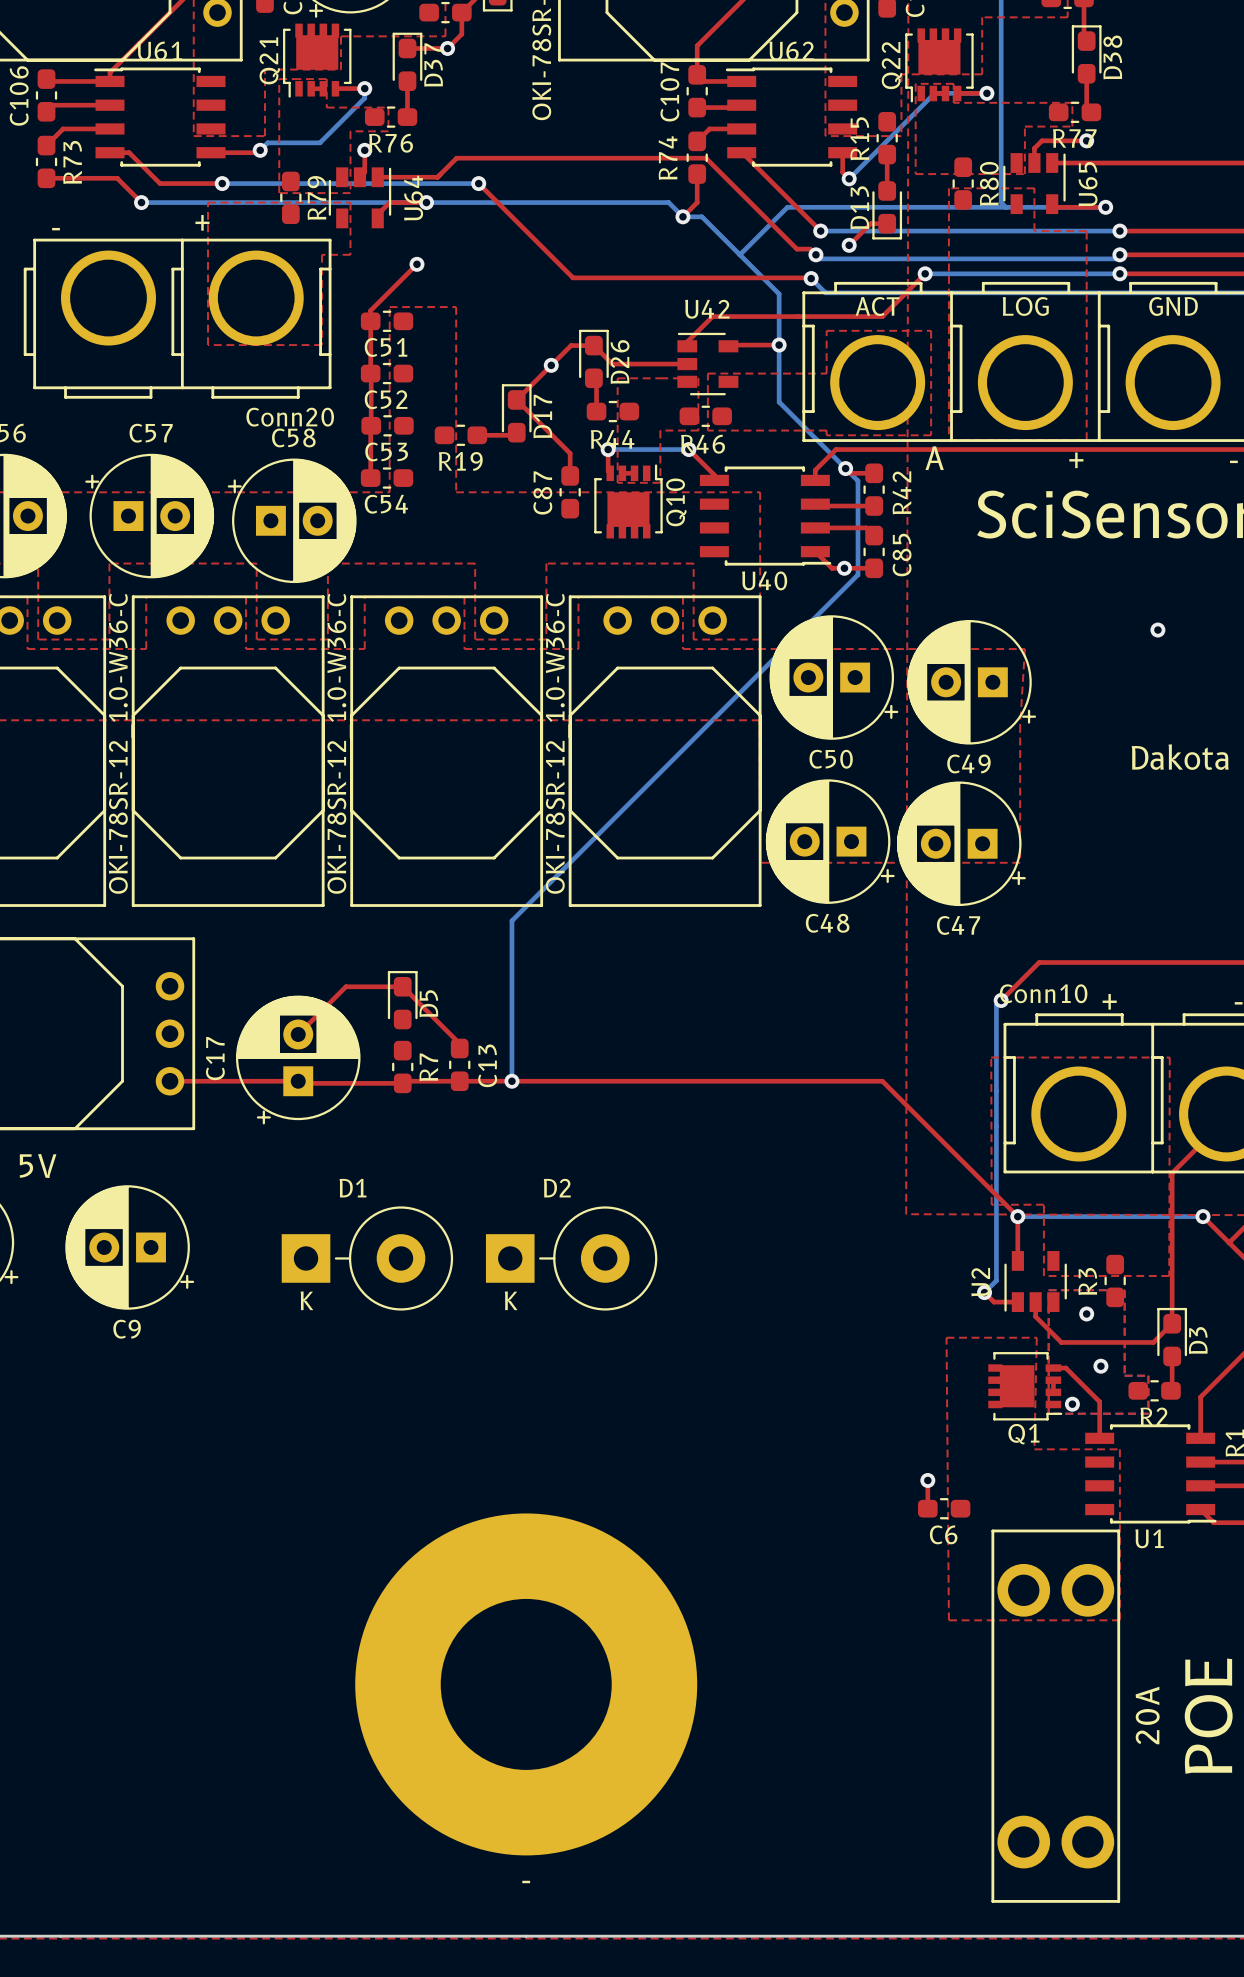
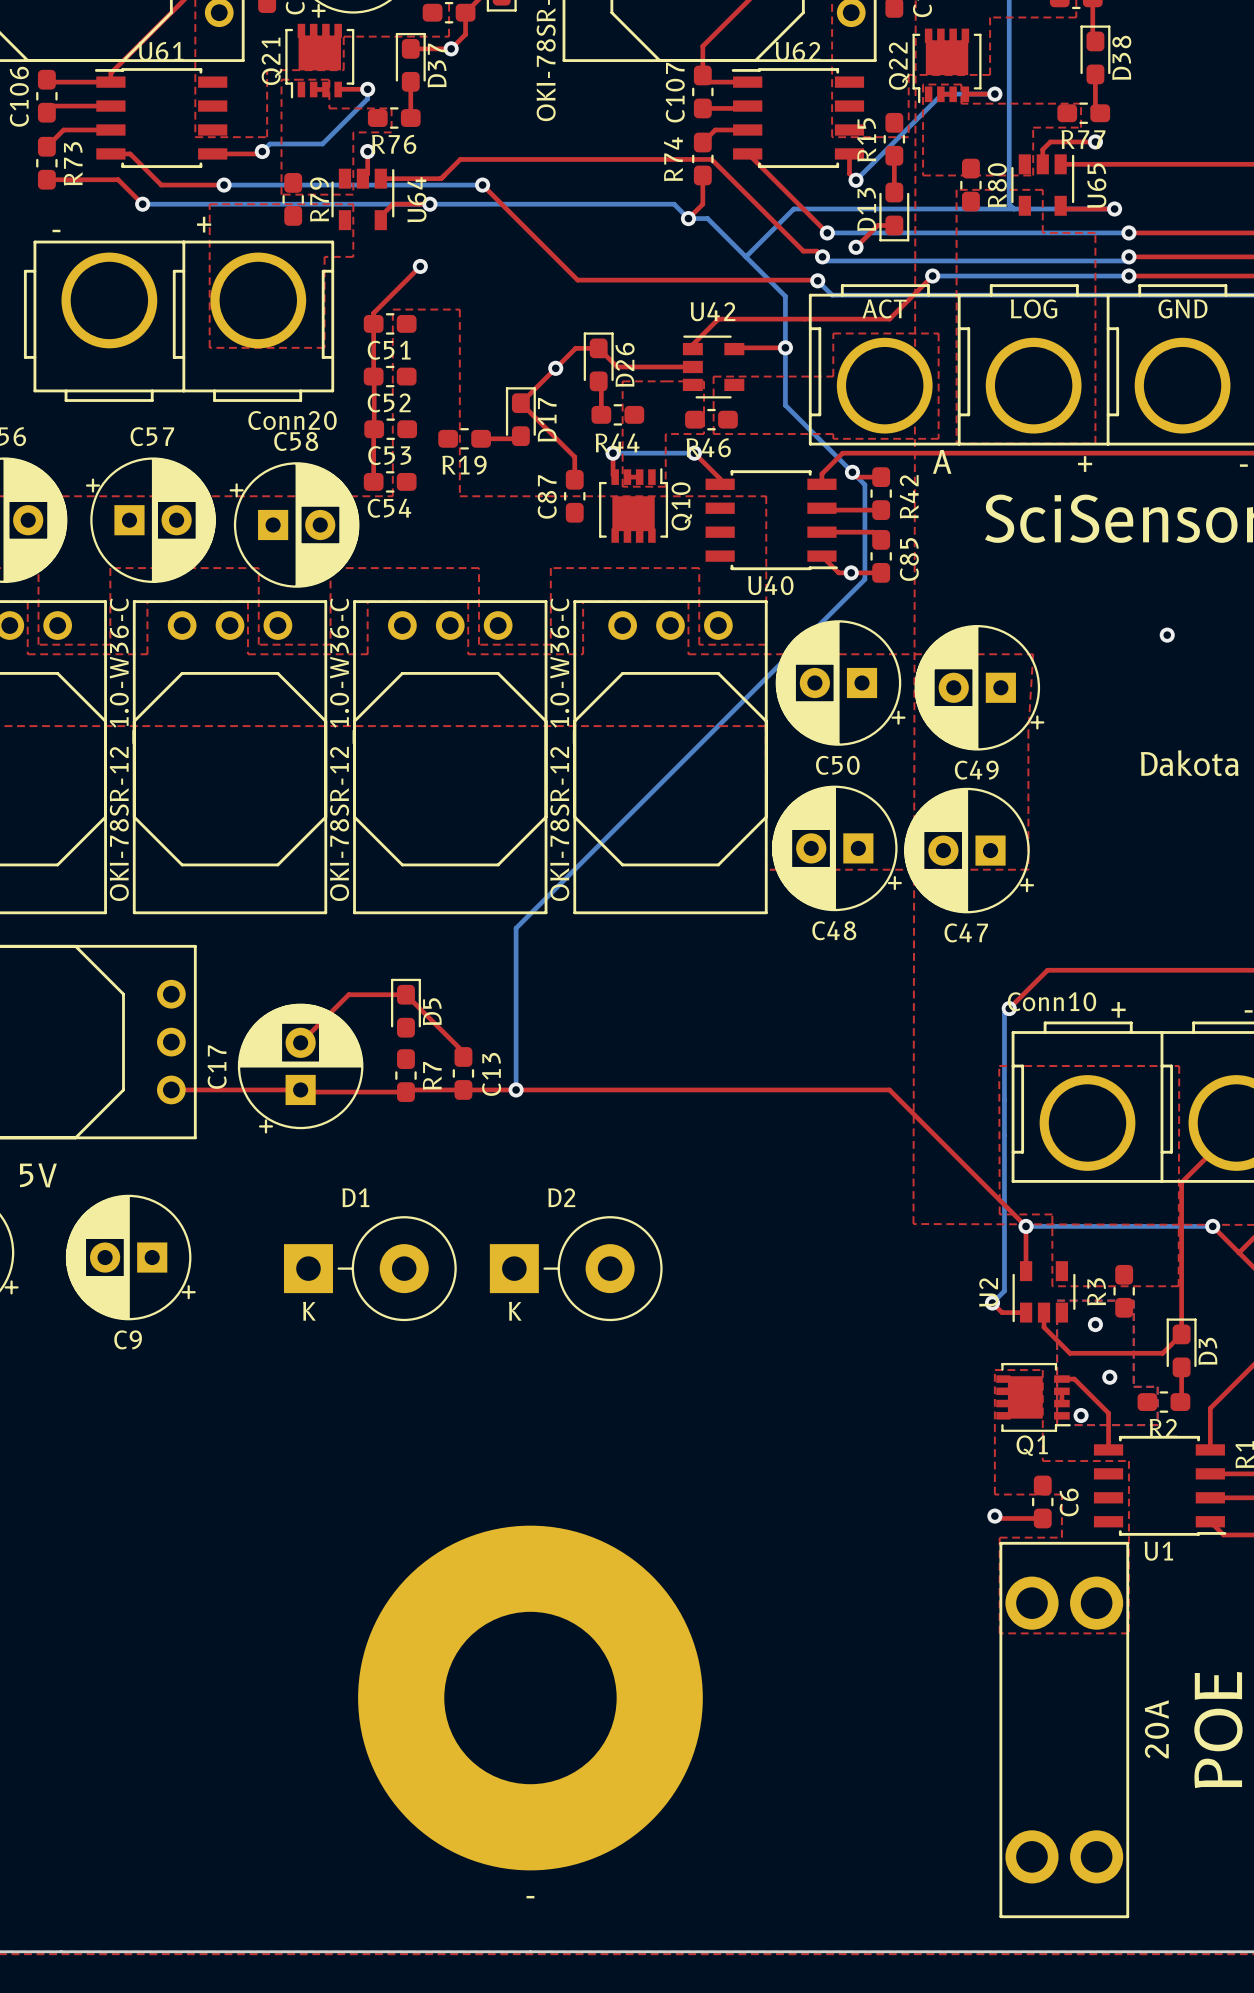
top zone outline: (1034, 1449) (1036, 1337) (946, 1337) (948, 1620) (991, 1620) -> (1042, 1461) (1042, 1370) (994, 1370) (994, 1494) (1061, 1494) (1061, 1537) (999, 1537) (999, 1633)
top track: (927, 1480) (927, 1508) -> none
via position: (927, 1480) -> (994, 1516)
top track: none -> (994, 1516) (997, 1518) (1042, 1518)
C6 rotation: 0° (944, 1508) -> 90° clockwise (1042, 1501)
C6 position: (944, 1508) -> (1042, 1501)
C6 name position: C6 (943, 1534) -> C6 (1069, 1502)

